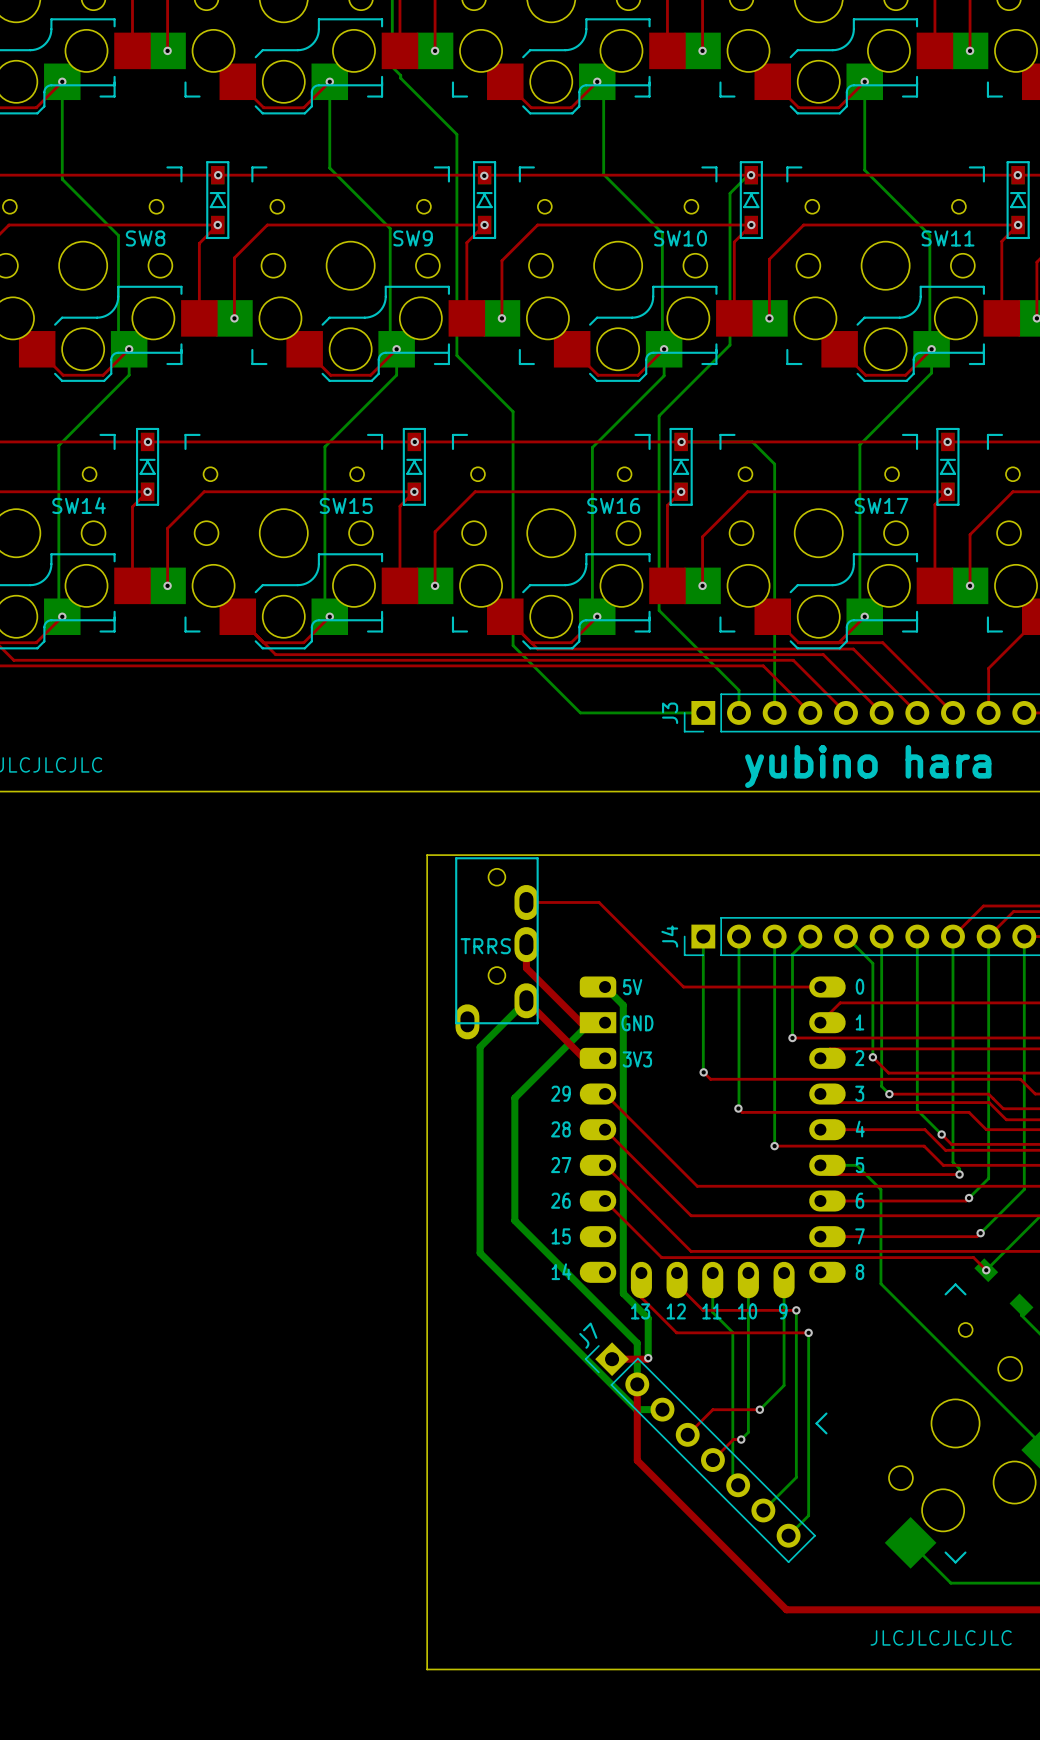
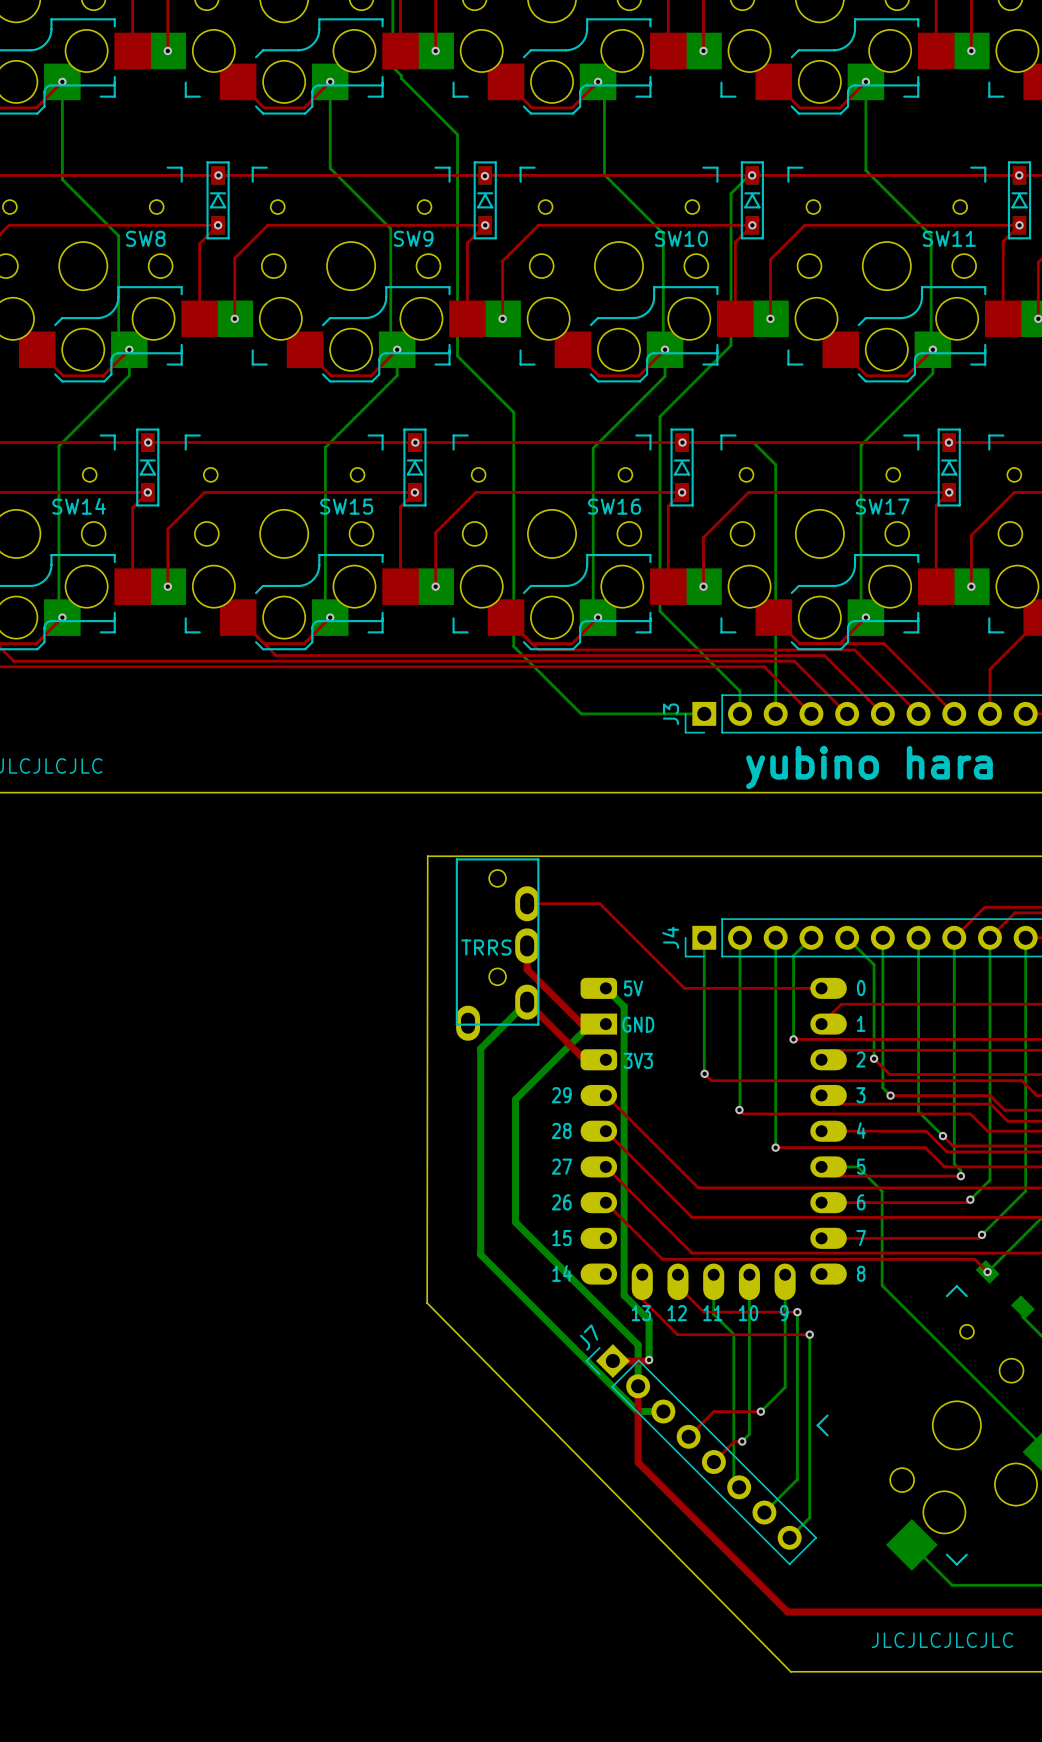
board edge: (427, 855) (427, 1669) (789, 1669) -> (427, 856) (427, 1303) (790, 1671)

